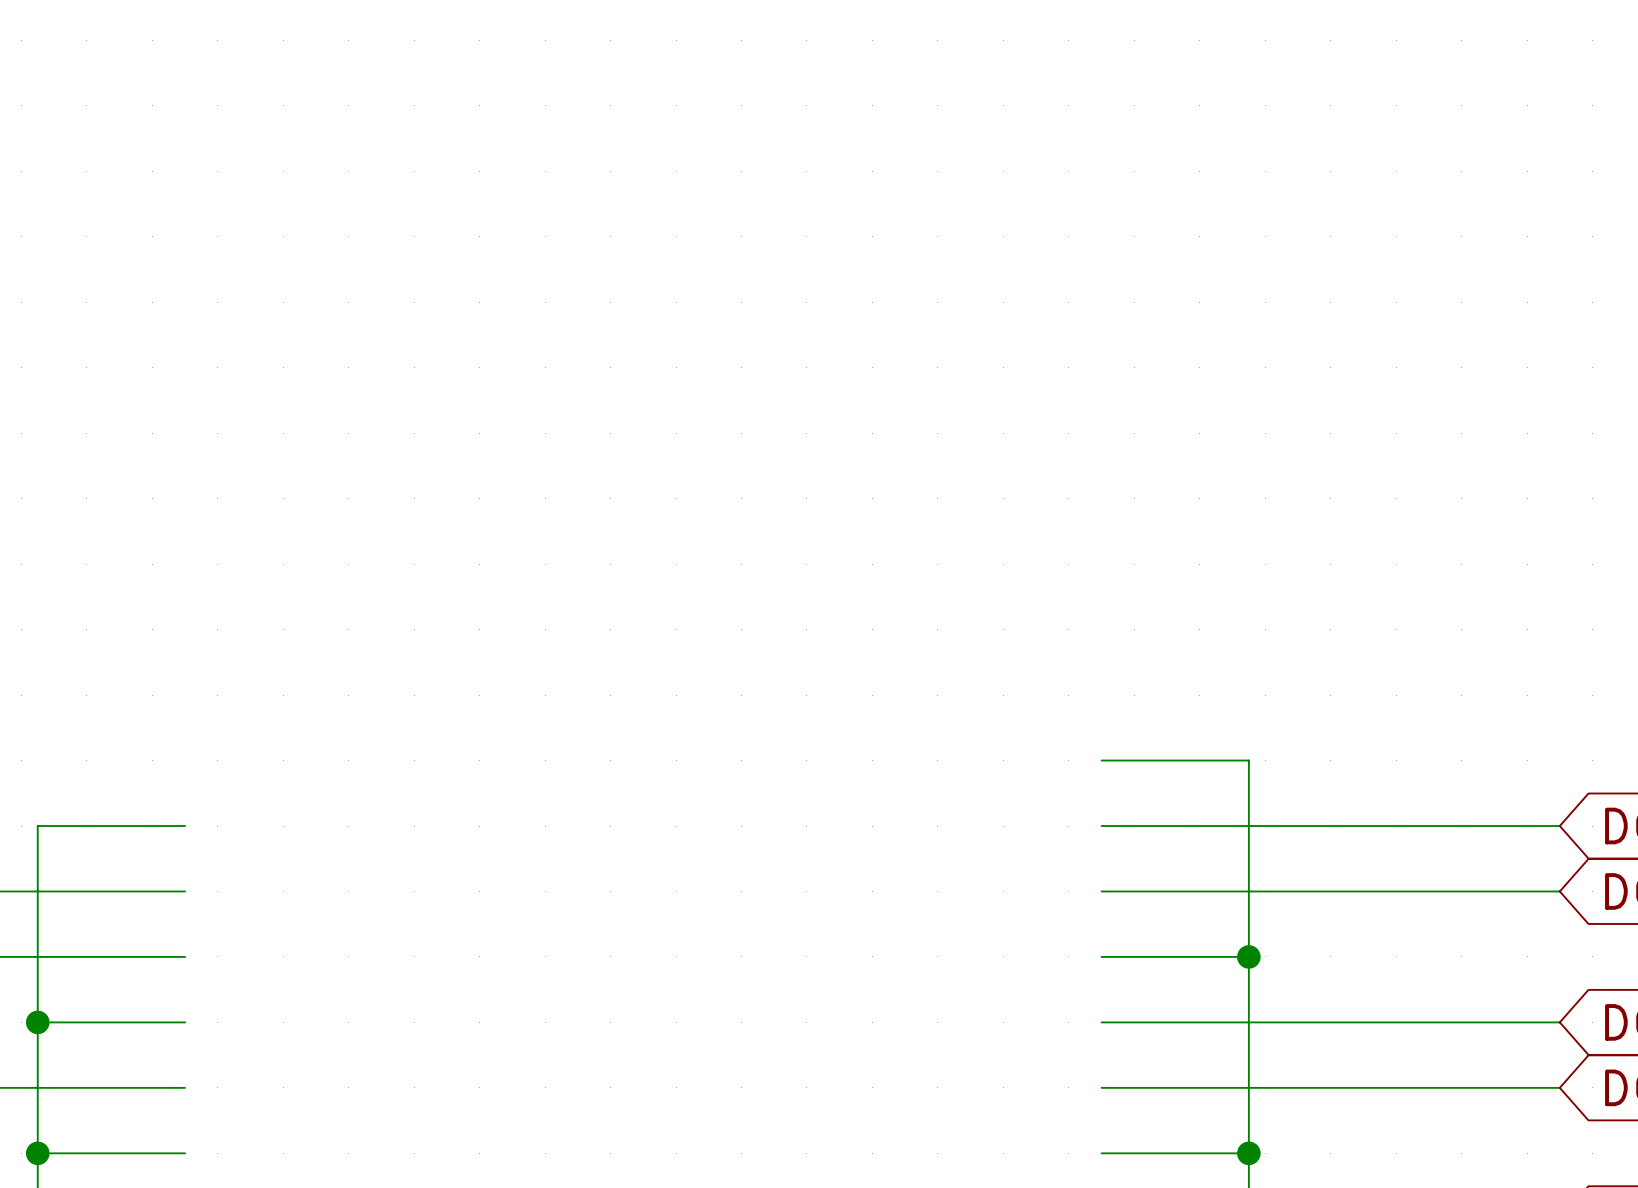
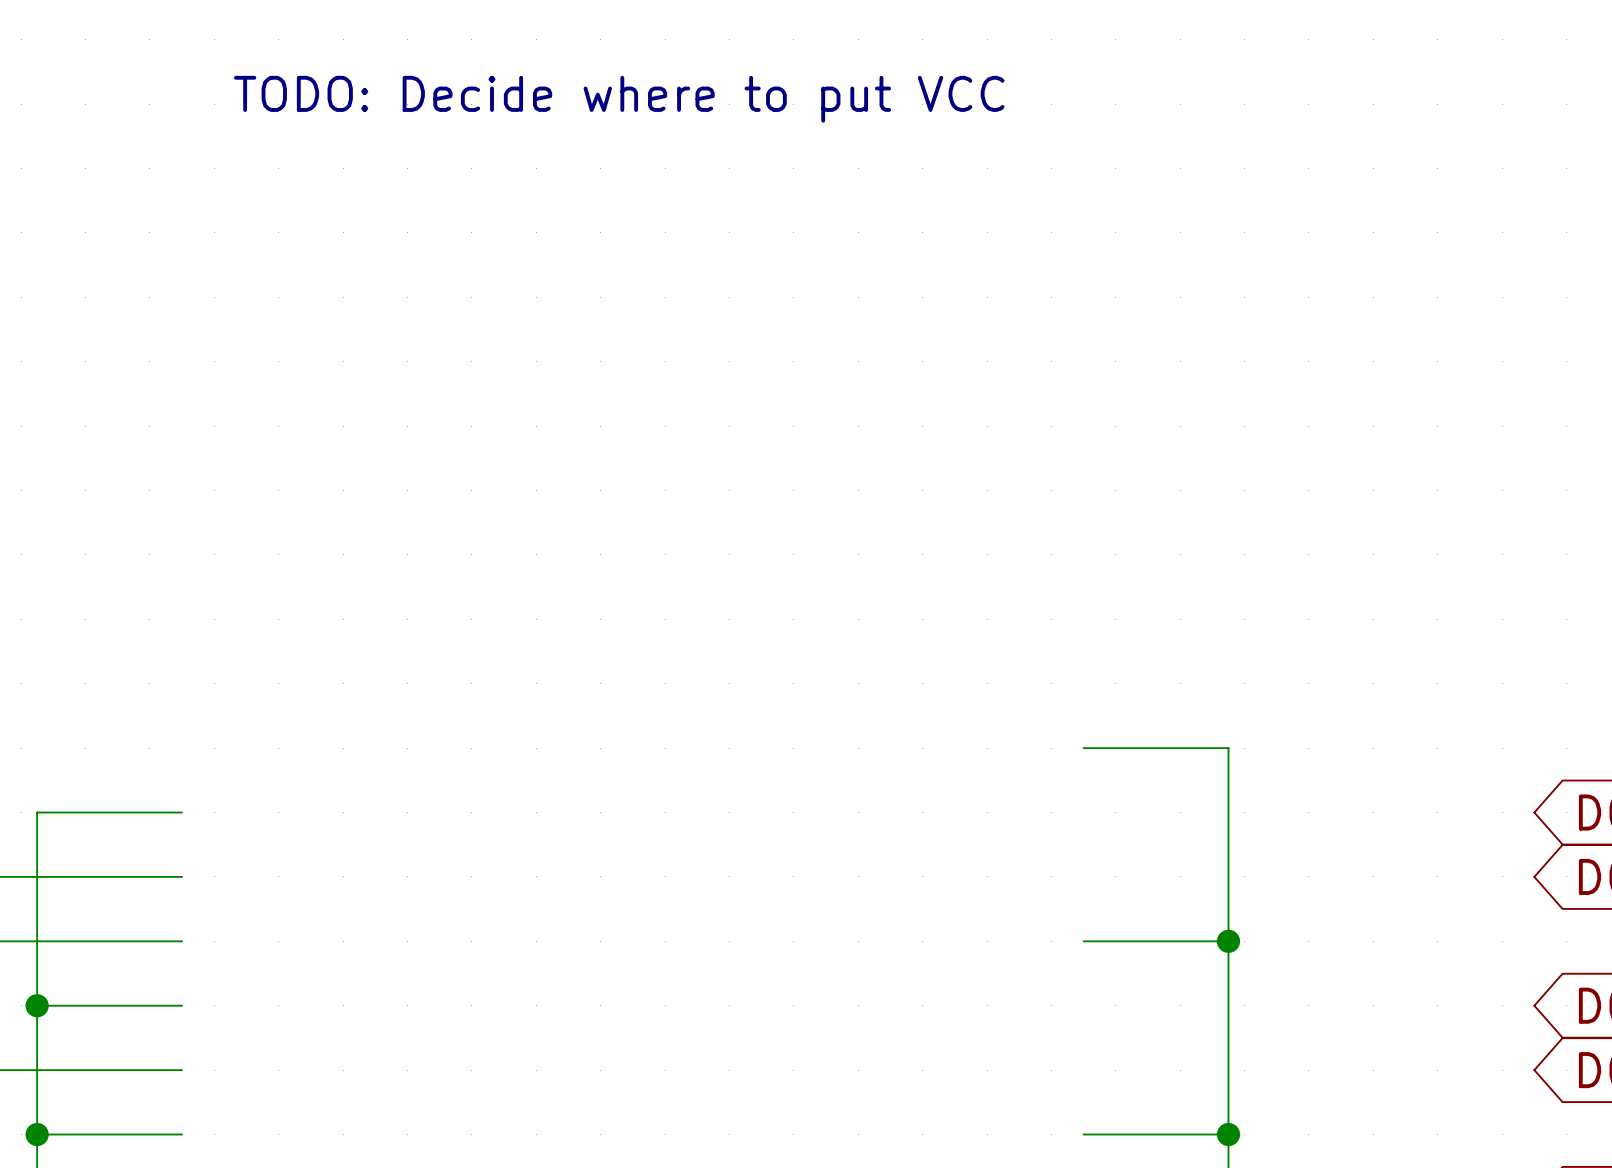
text: none -> TODO: Decide where to put VCC (619, 99)
wire: (1101, 826) (1559, 826) -> none
wire: (1101, 891) (1559, 891) -> none
wire: (1101, 1022) (1559, 1022) -> none
wire: (1101, 1087) (1559, 1087) -> none

